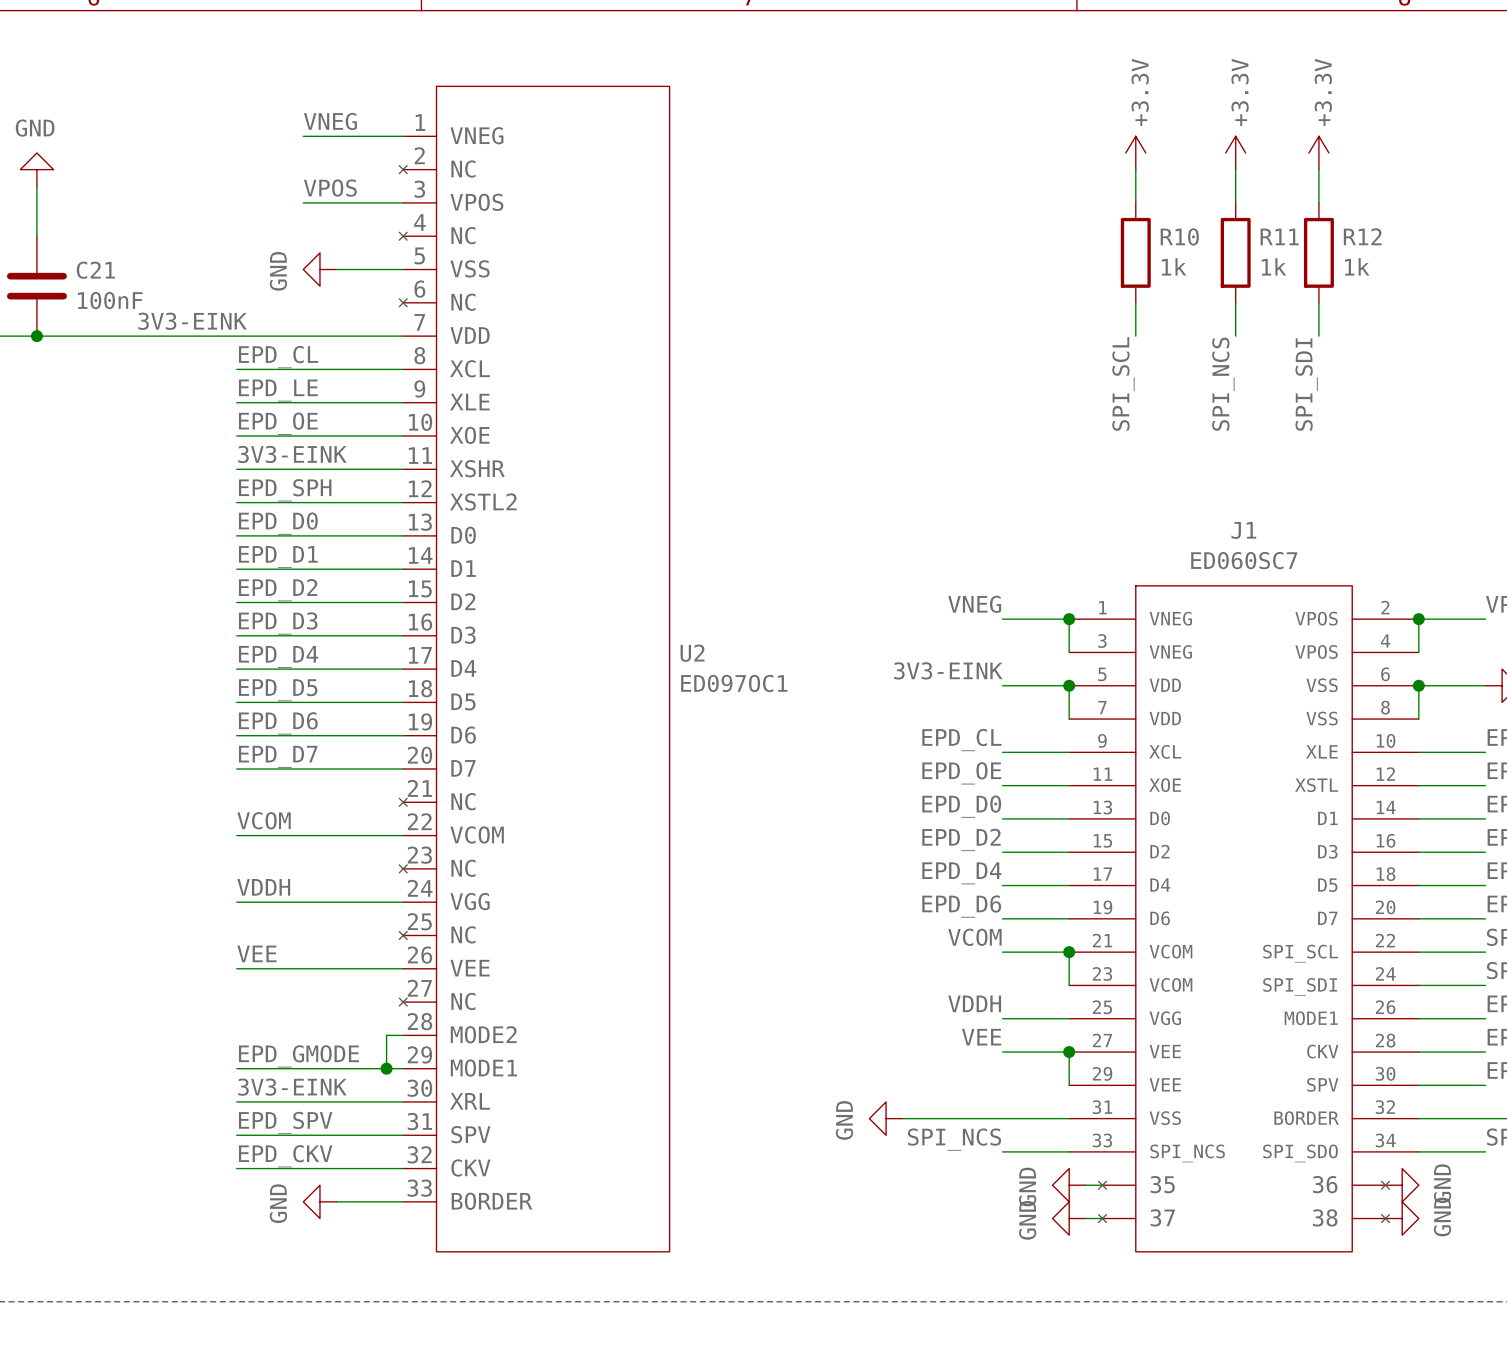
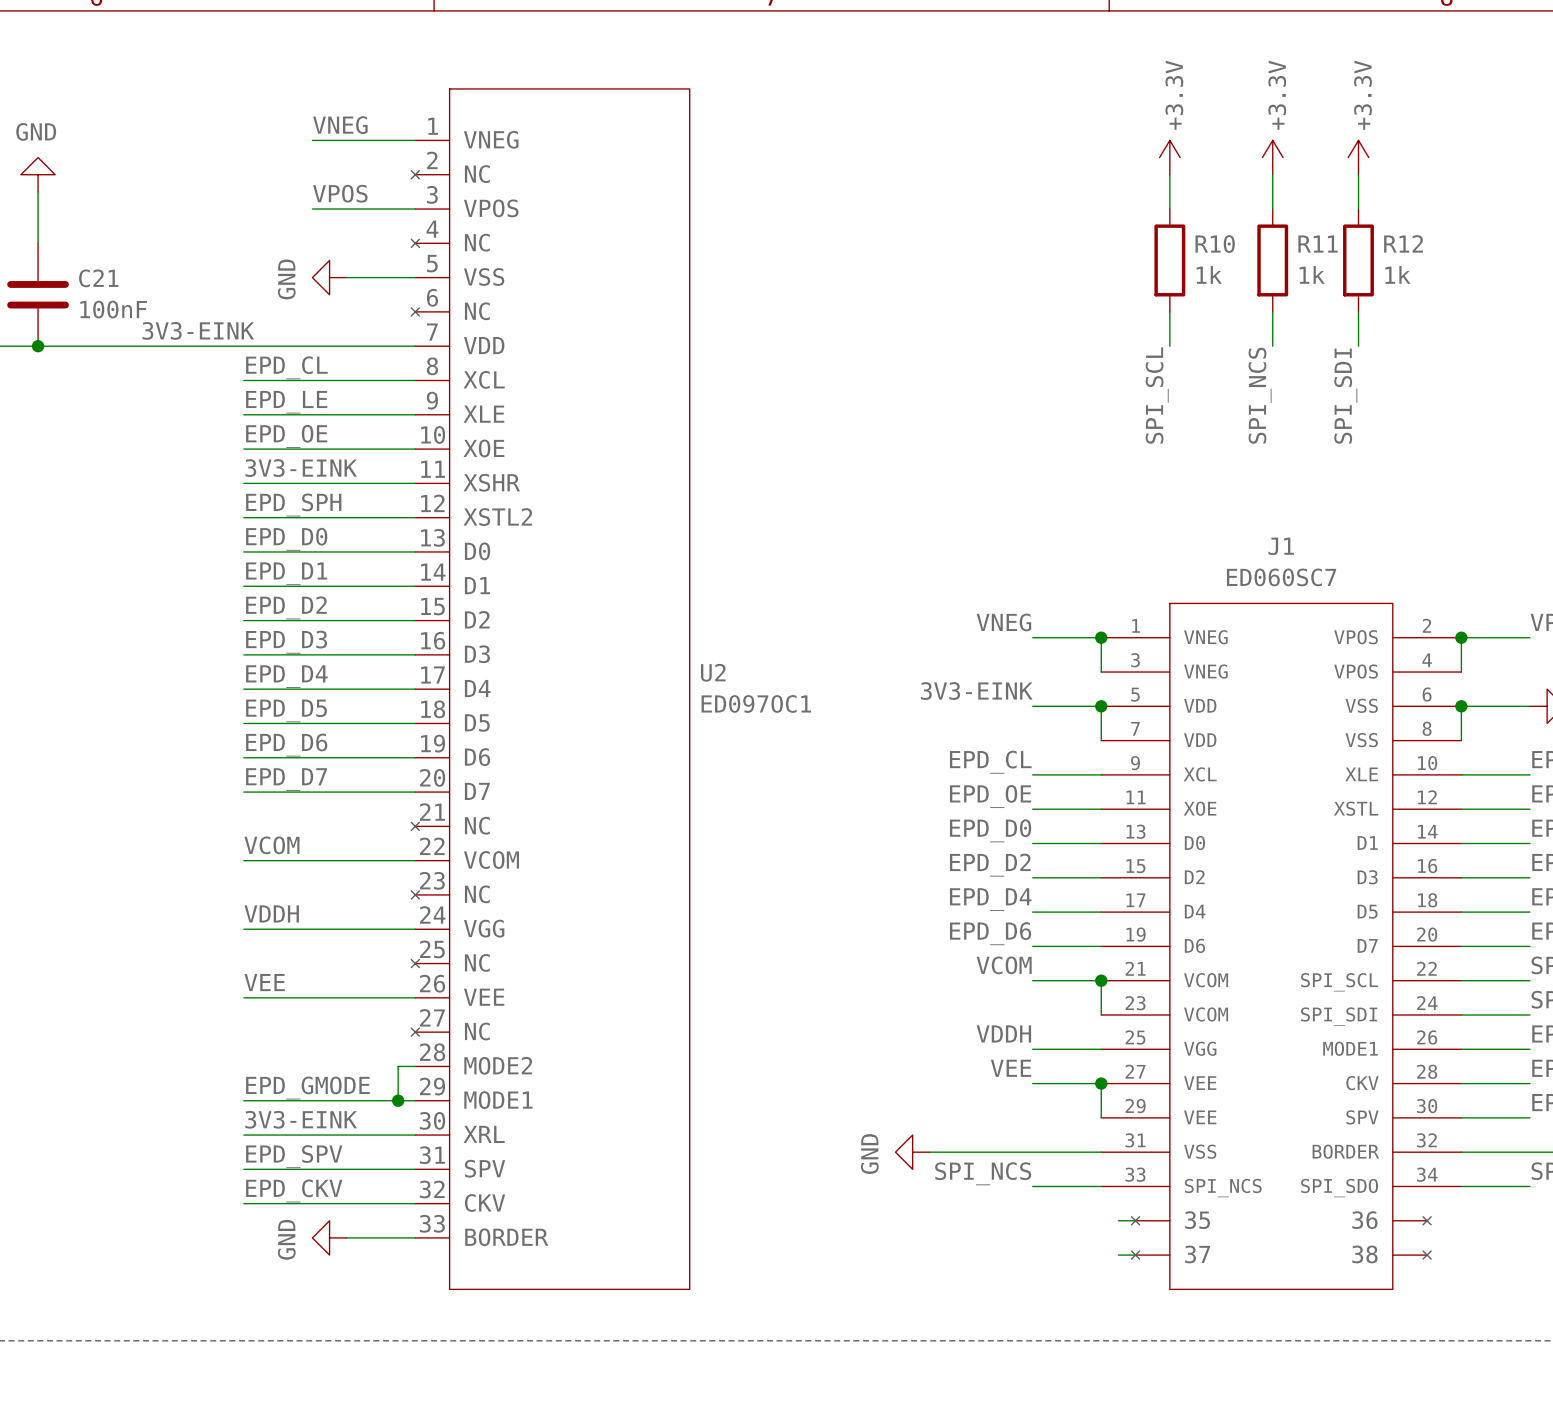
power symbol: GND (1069, 1185) -> none
power symbol: GND (1402, 1185) -> none
power symbol: GND (1069, 1218) -> none
power symbol: GND (1402, 1218) -> none

